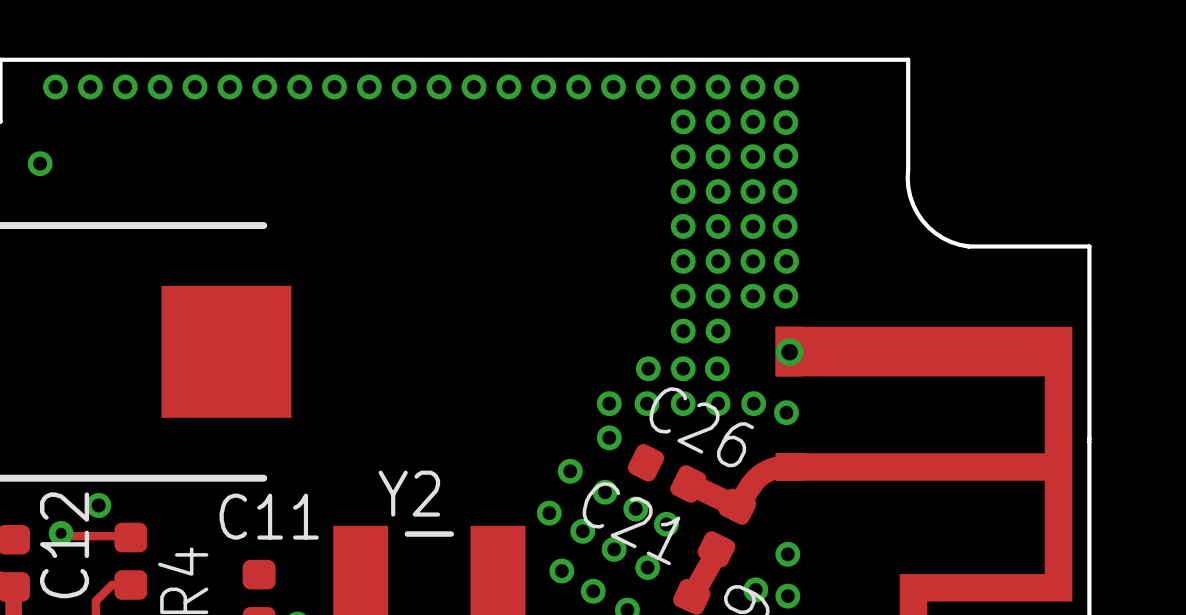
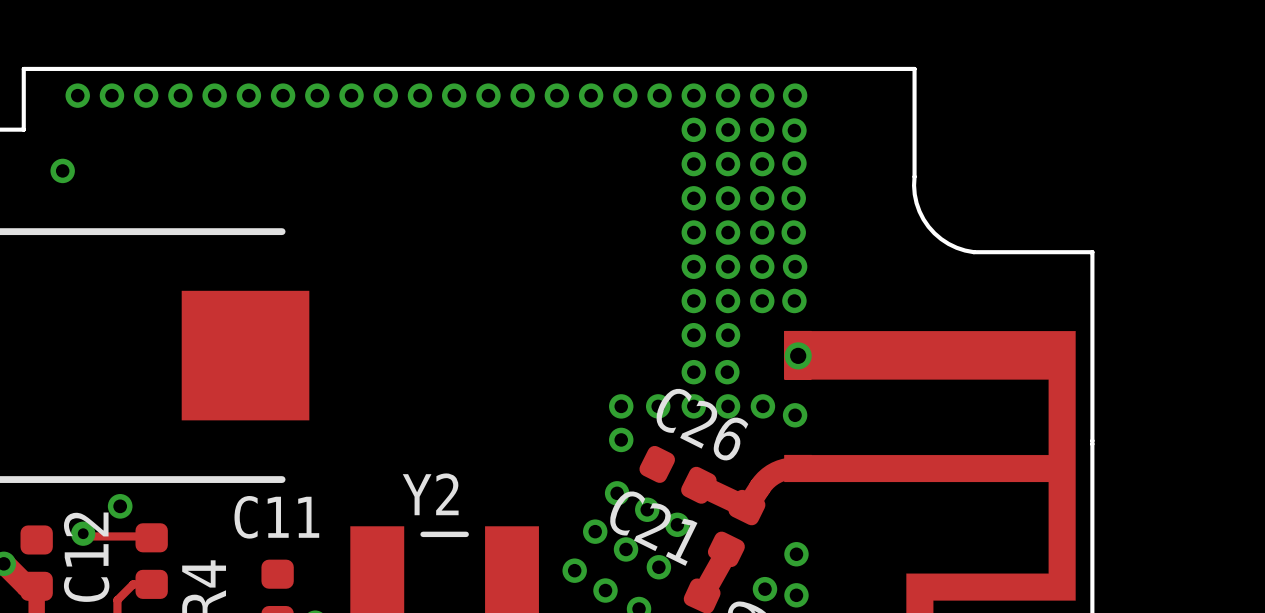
via: (648, 368) -> none
via: (570, 471) -> none
via: (549, 513) -> none

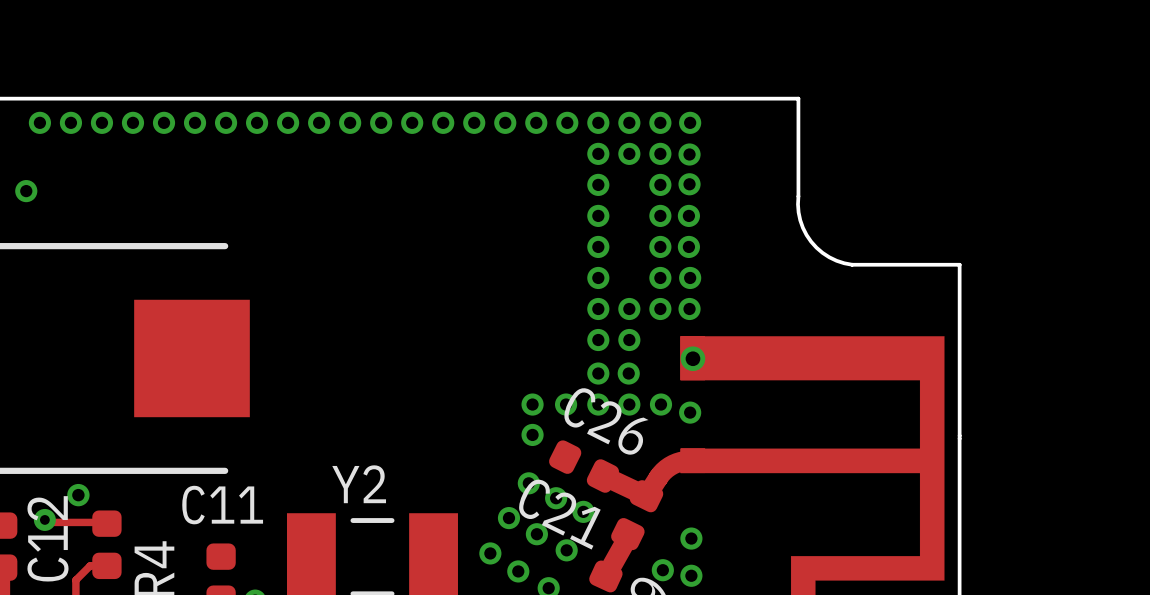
via: (728, 164) -> none
via: (728, 198) -> none
via: (728, 232) -> none
via: (728, 266) -> none

